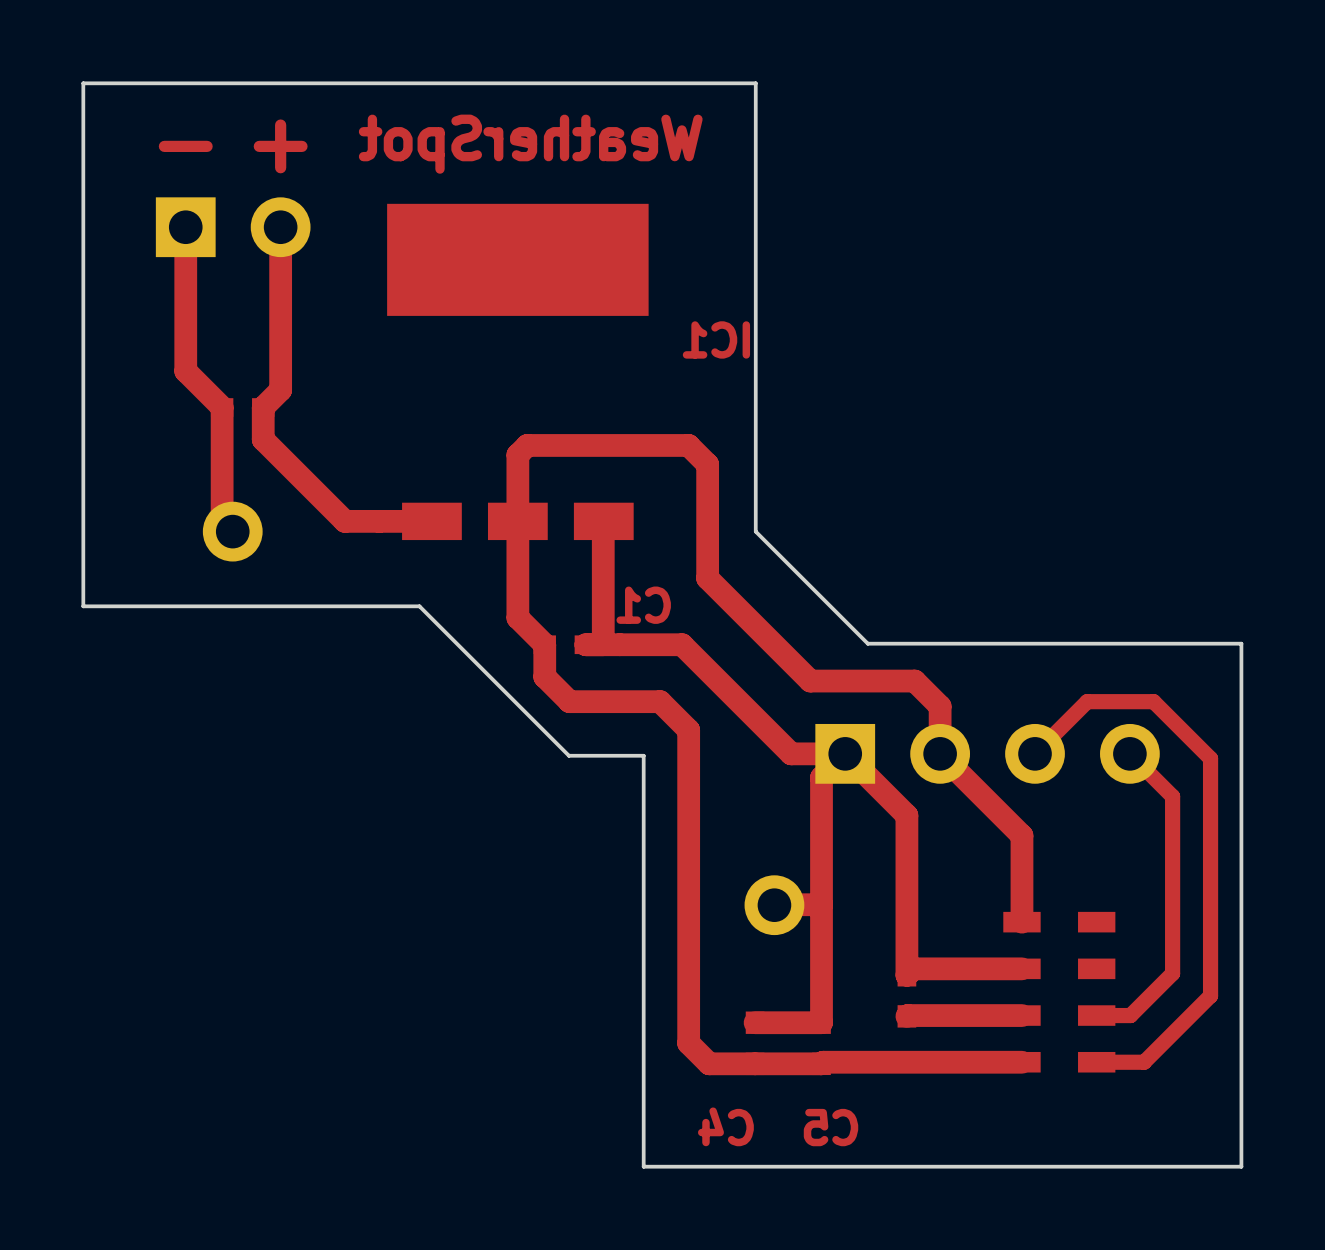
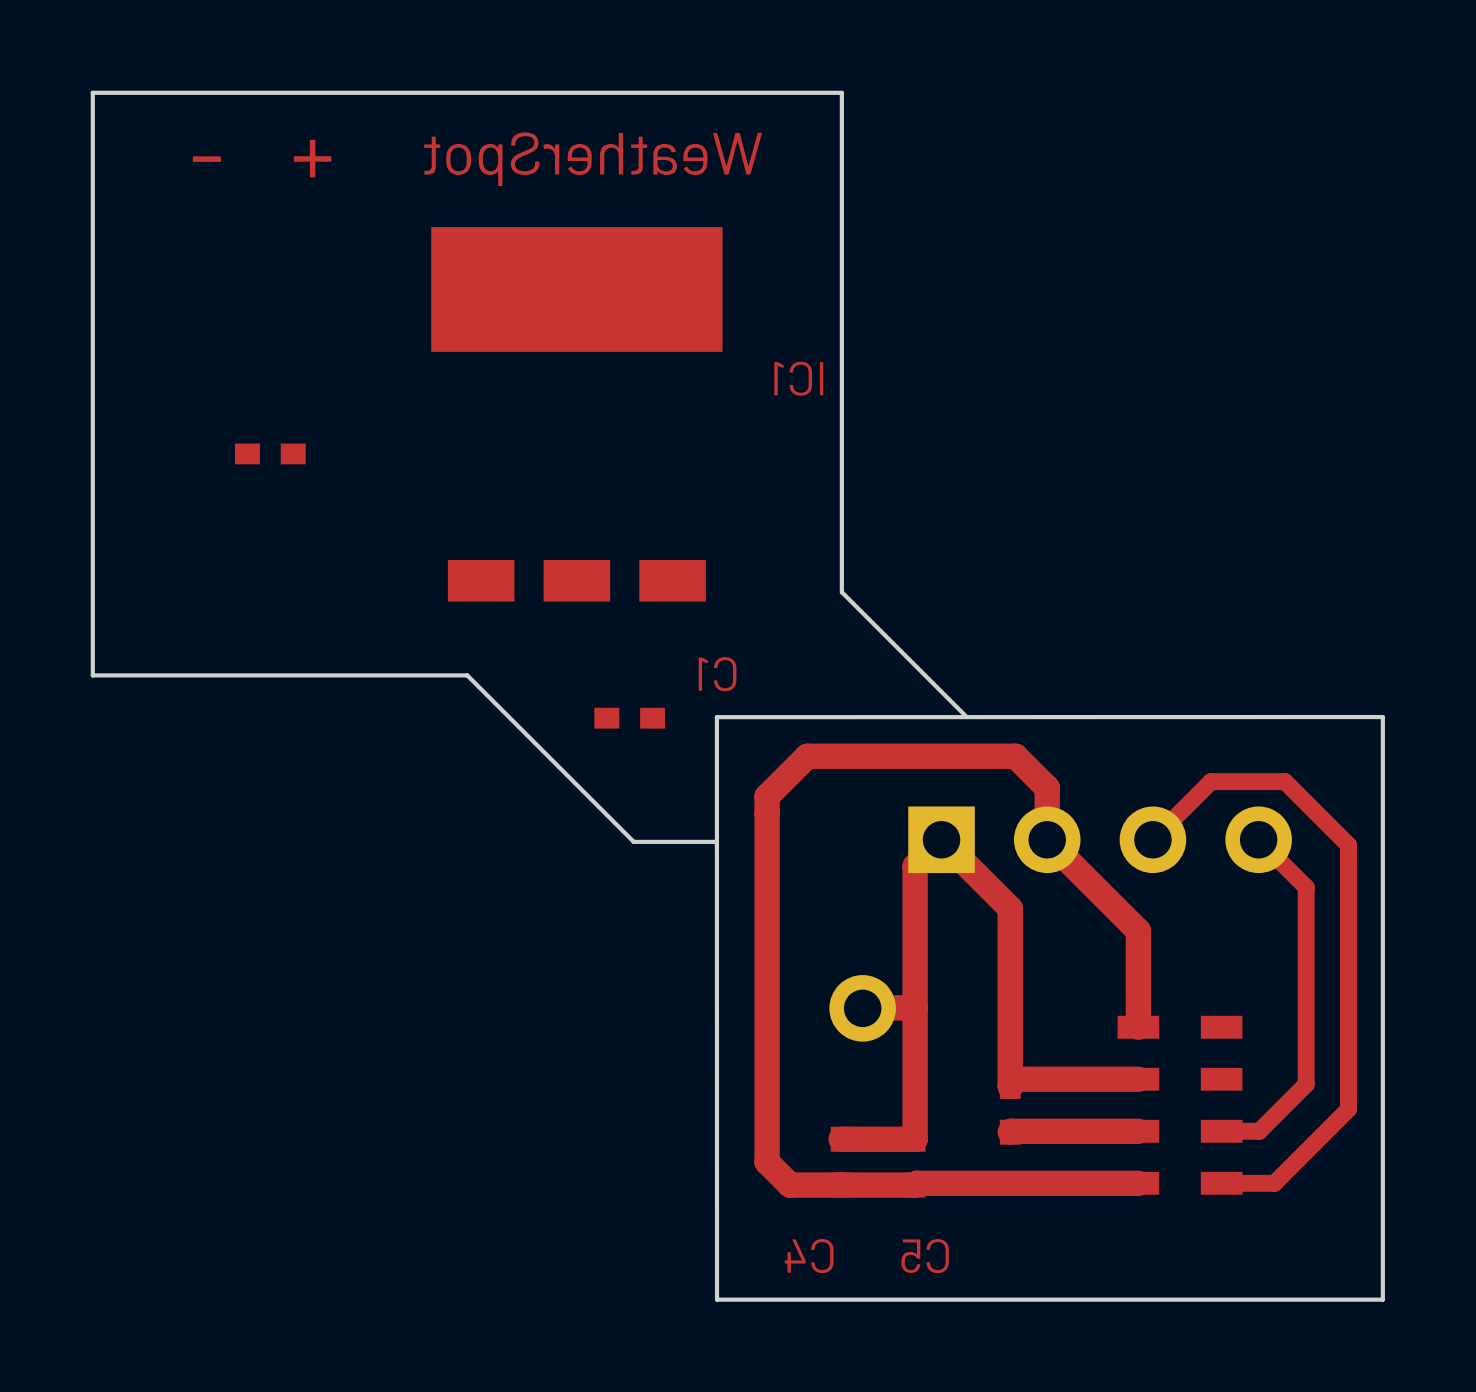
top track: (185, 227) (185, 371) (222, 407) (222, 521) (232, 531) -> none
part: (233, 227) -> none
top track: (280, 227) (280, 390) (263, 407) (263, 439) (344, 521) (431, 521) -> none
top track: (603, 521) (603, 644) -> none
part: (232, 531) -> none
board edge: (1241, 643) (867, 643) -> (1382, 717) (716, 717) (717, 1299)
top track: (585, 644) (682, 644) (791, 753) (845, 753) (906, 815) -> (941, 839) (1010, 908)
top track: (688, 730) (660, 701) (569, 701) (544, 676) (544, 644) (517, 617) (517, 454) (527, 445) (688, 445) (707, 464) (707, 578) (810, 681) (914, 681) (940, 706) (940, 753) -> (767, 813) (767, 796) (807, 756) (1015, 756) (1047, 787) (1047, 839)

